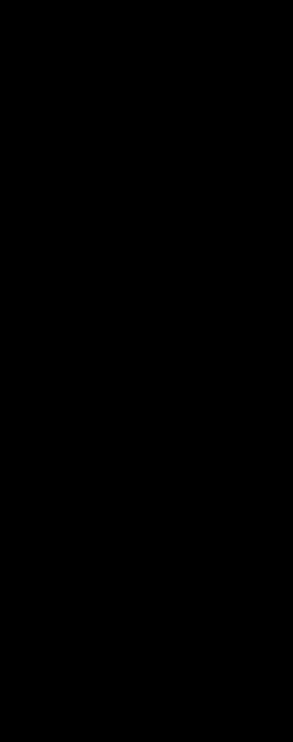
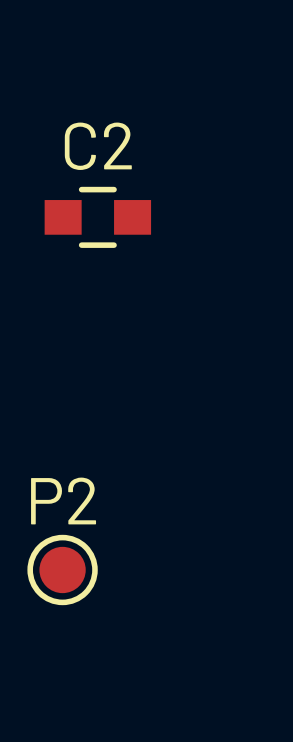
C2: none -> (97, 217)
P2: none -> (62, 569)

